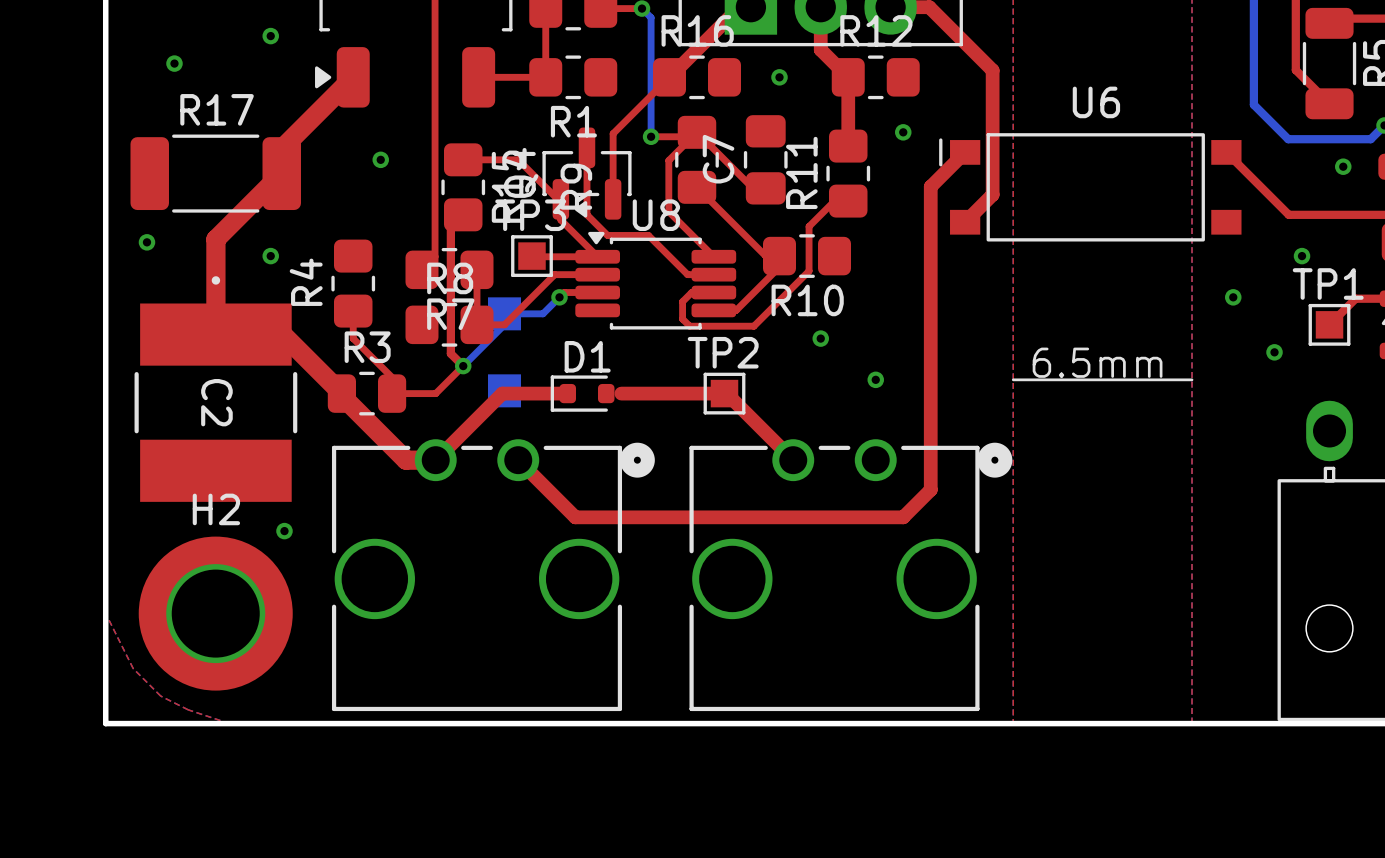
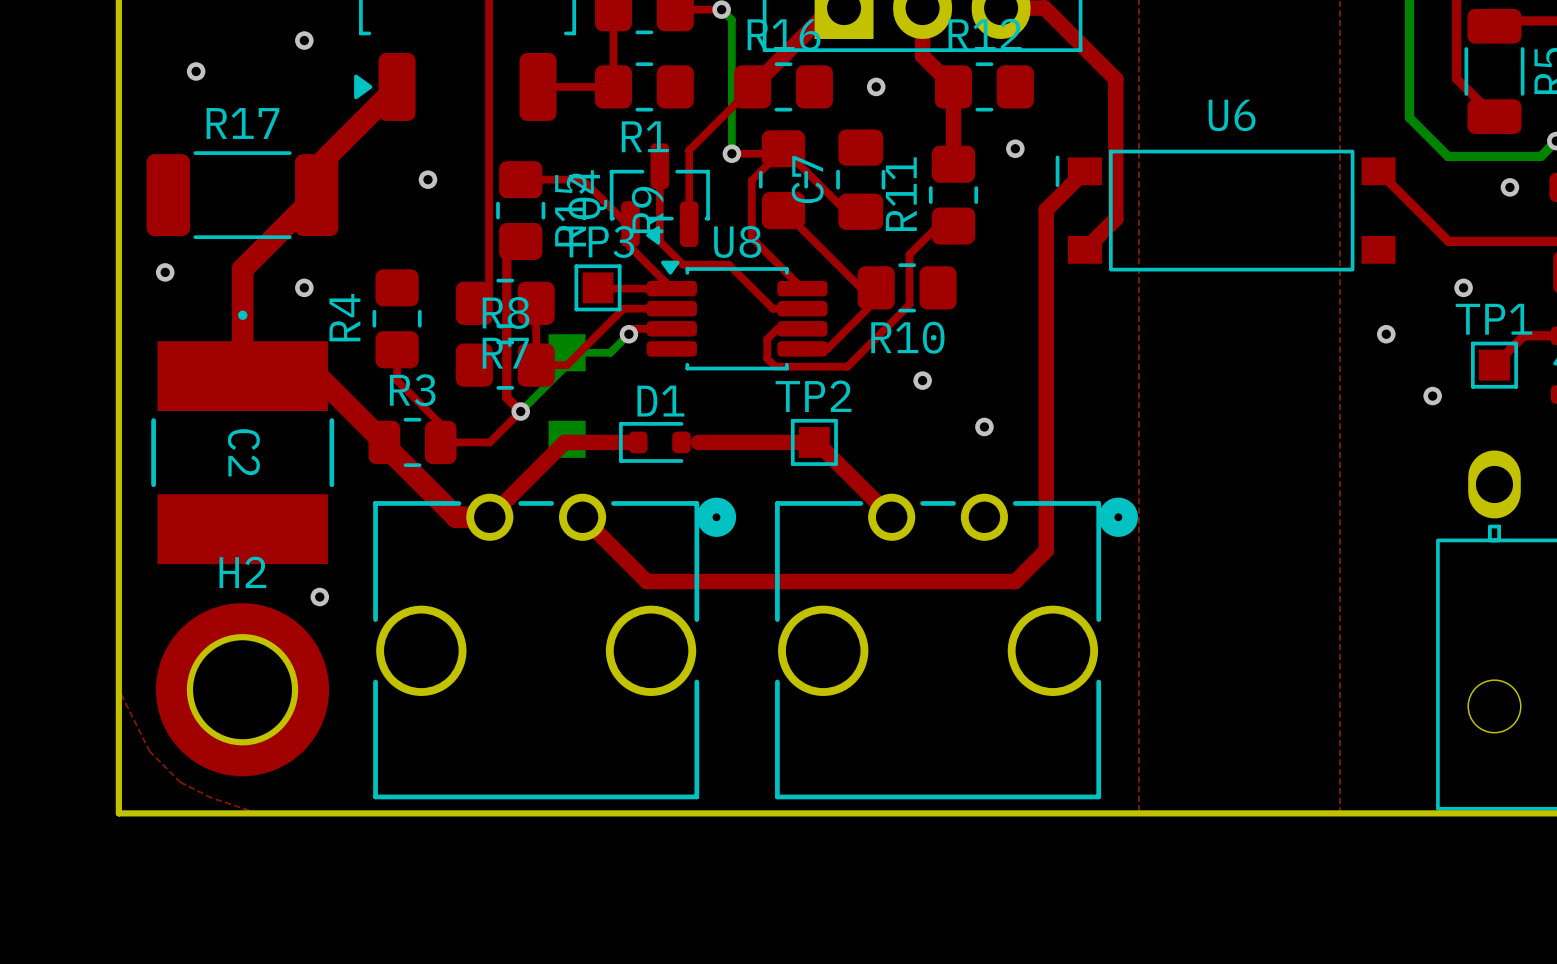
text: 6.5mm (1097, 362) -> none
line: (1013, 379) (1192, 379) -> none

